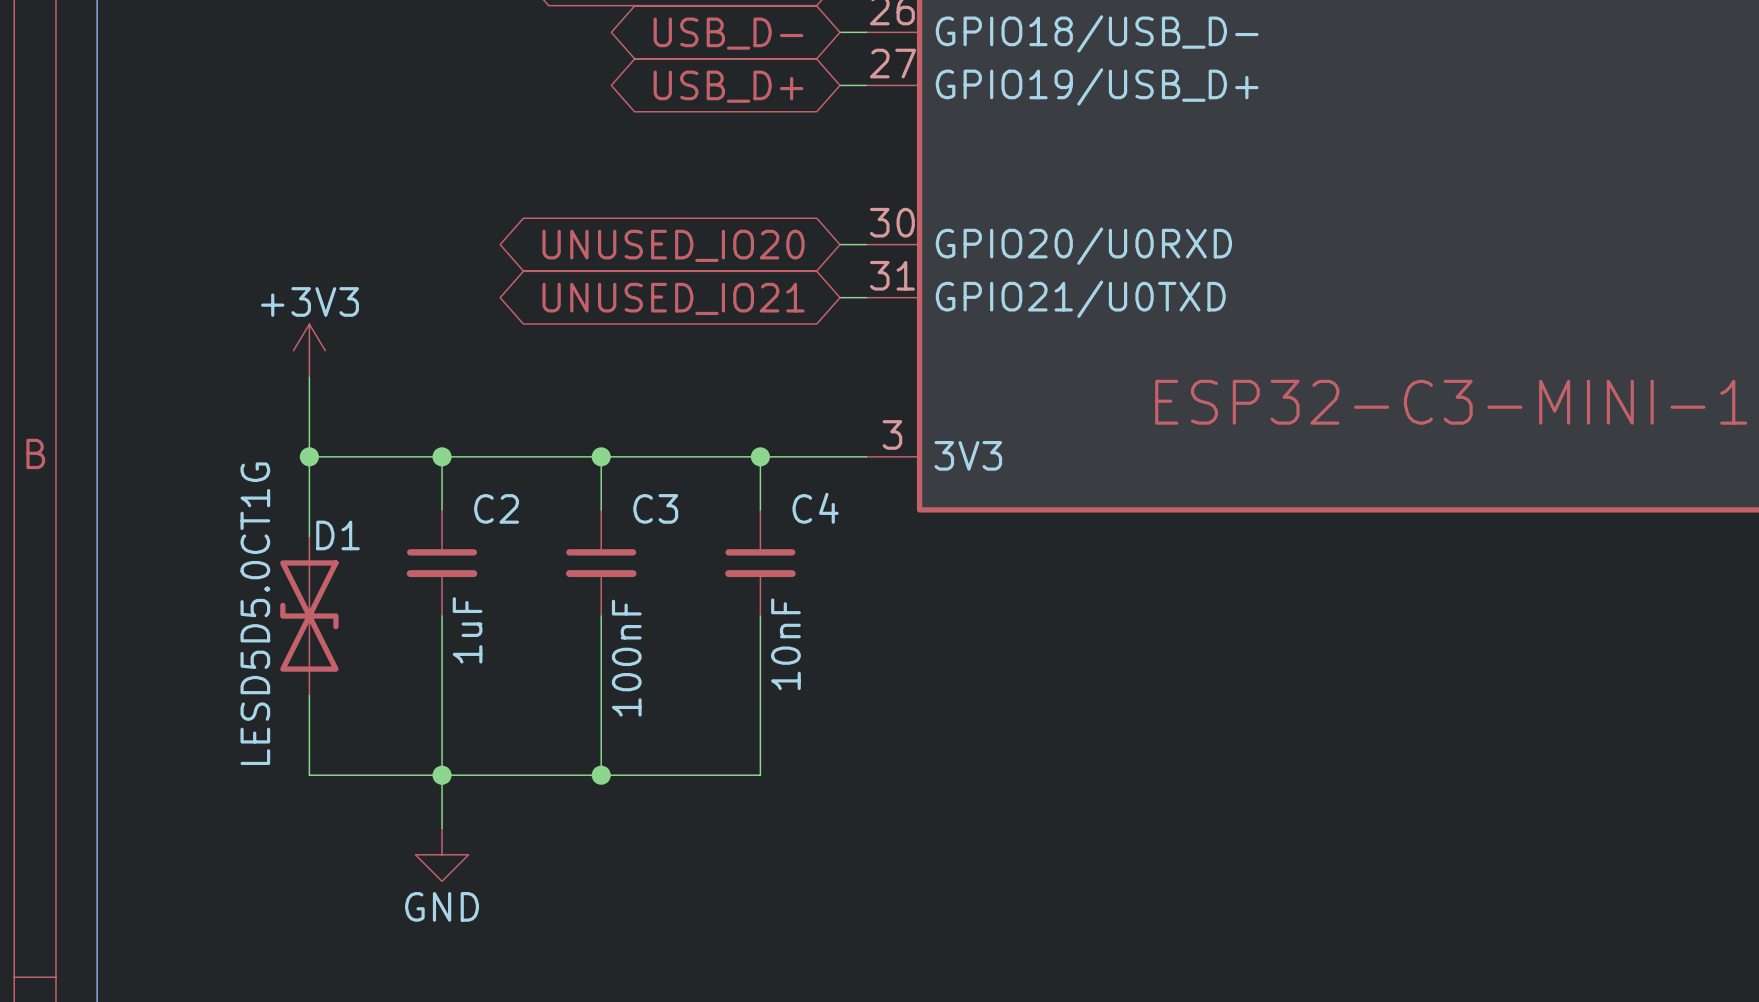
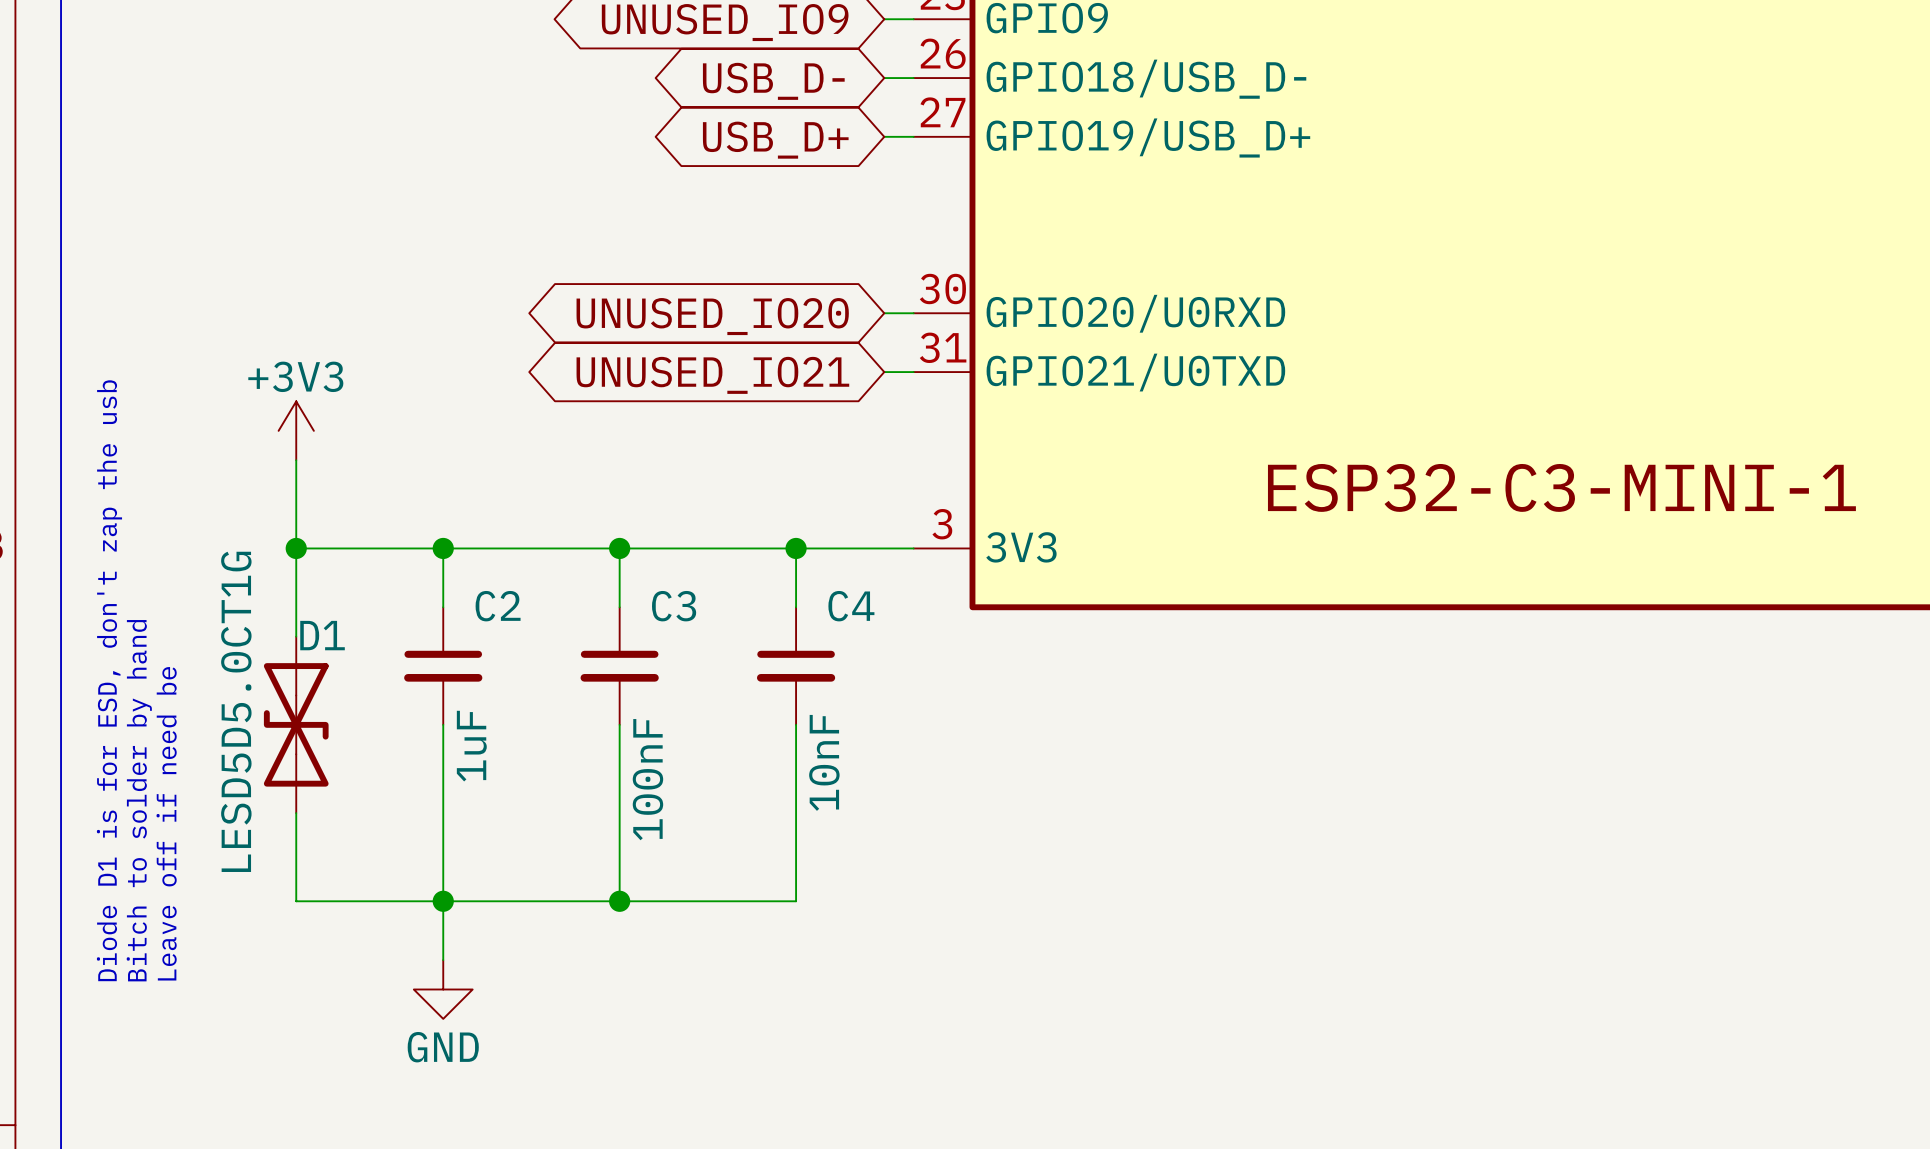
text: none -> Diode D1 is for ESD, don't zap the usb (109, 680)
text: none -> Bitch to solder by hand (139, 800)
text: none -> Leave off if need be (166, 823)

